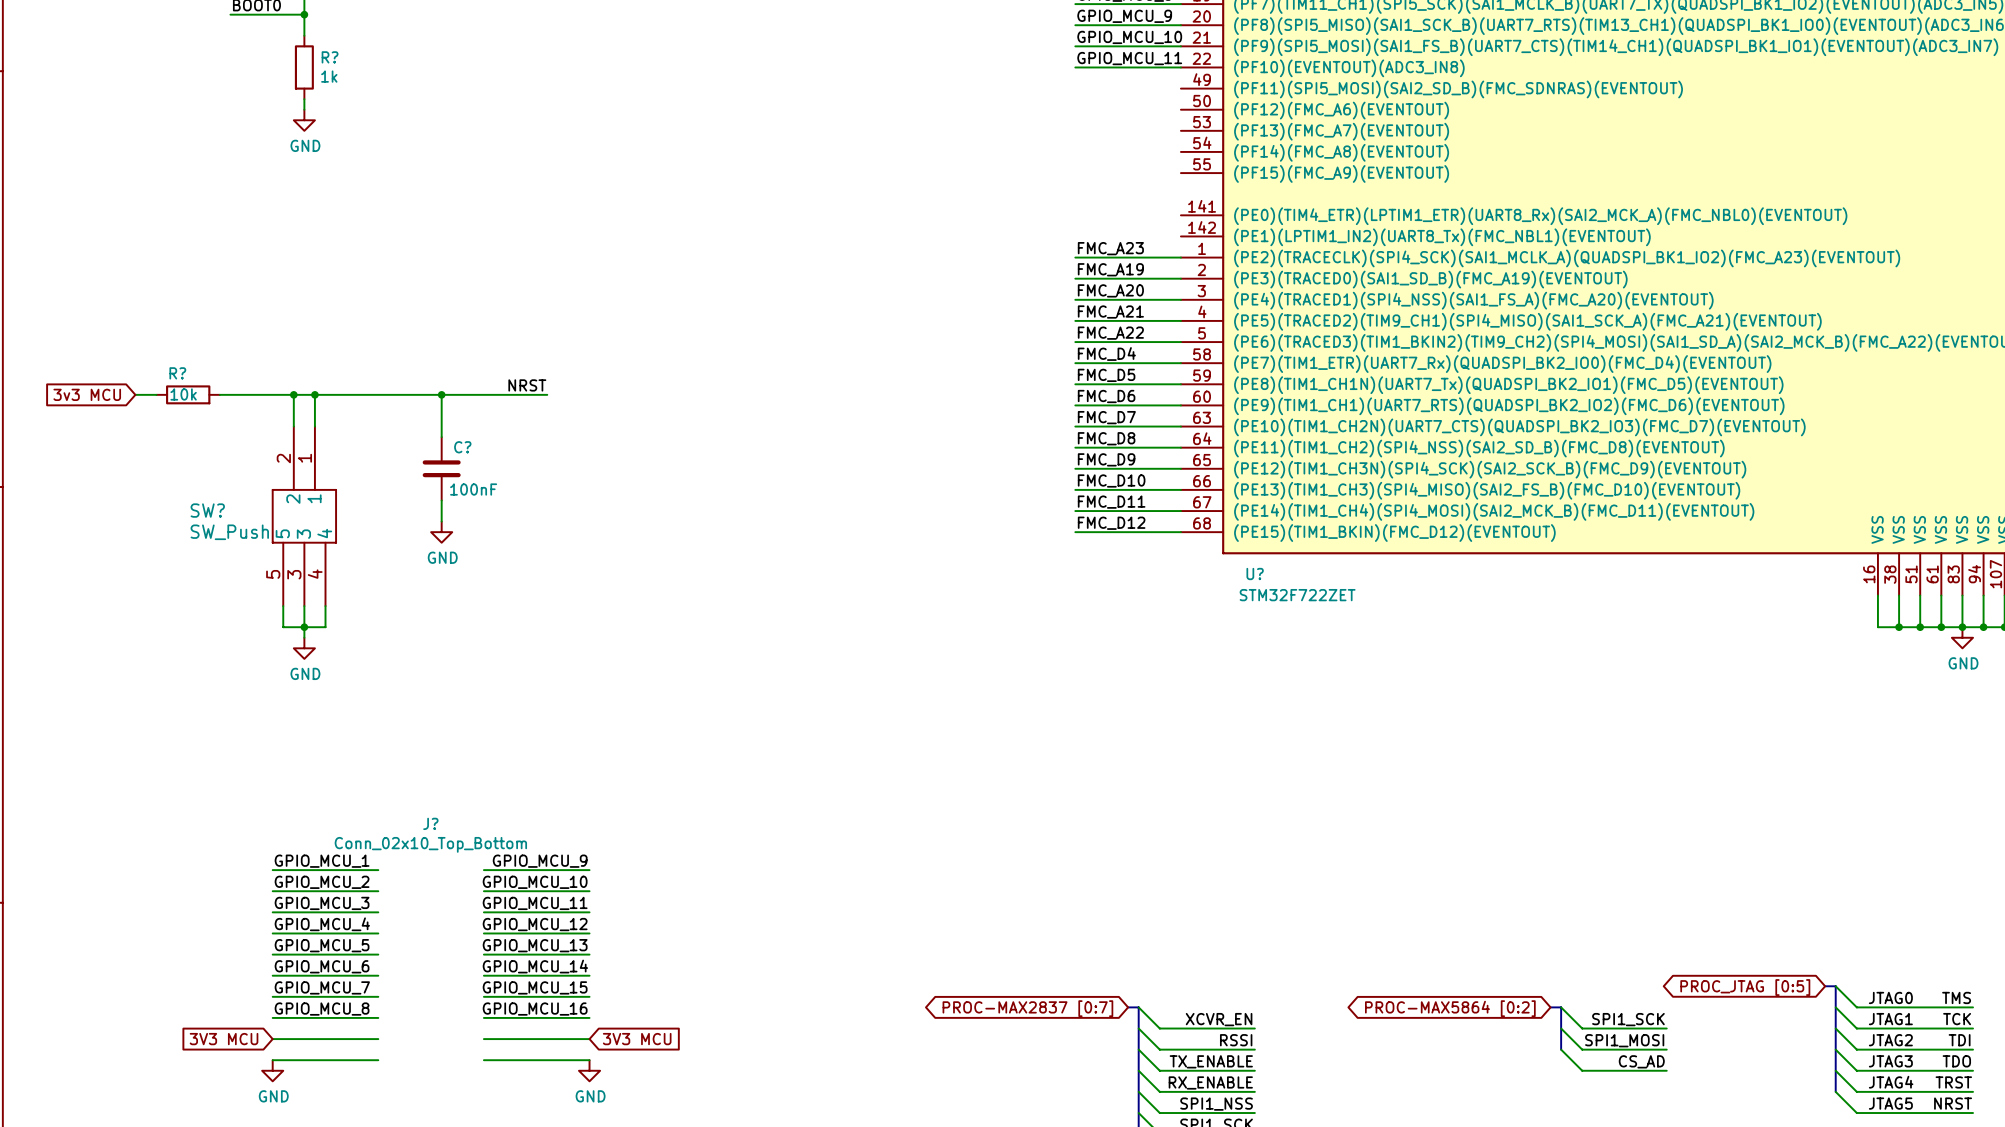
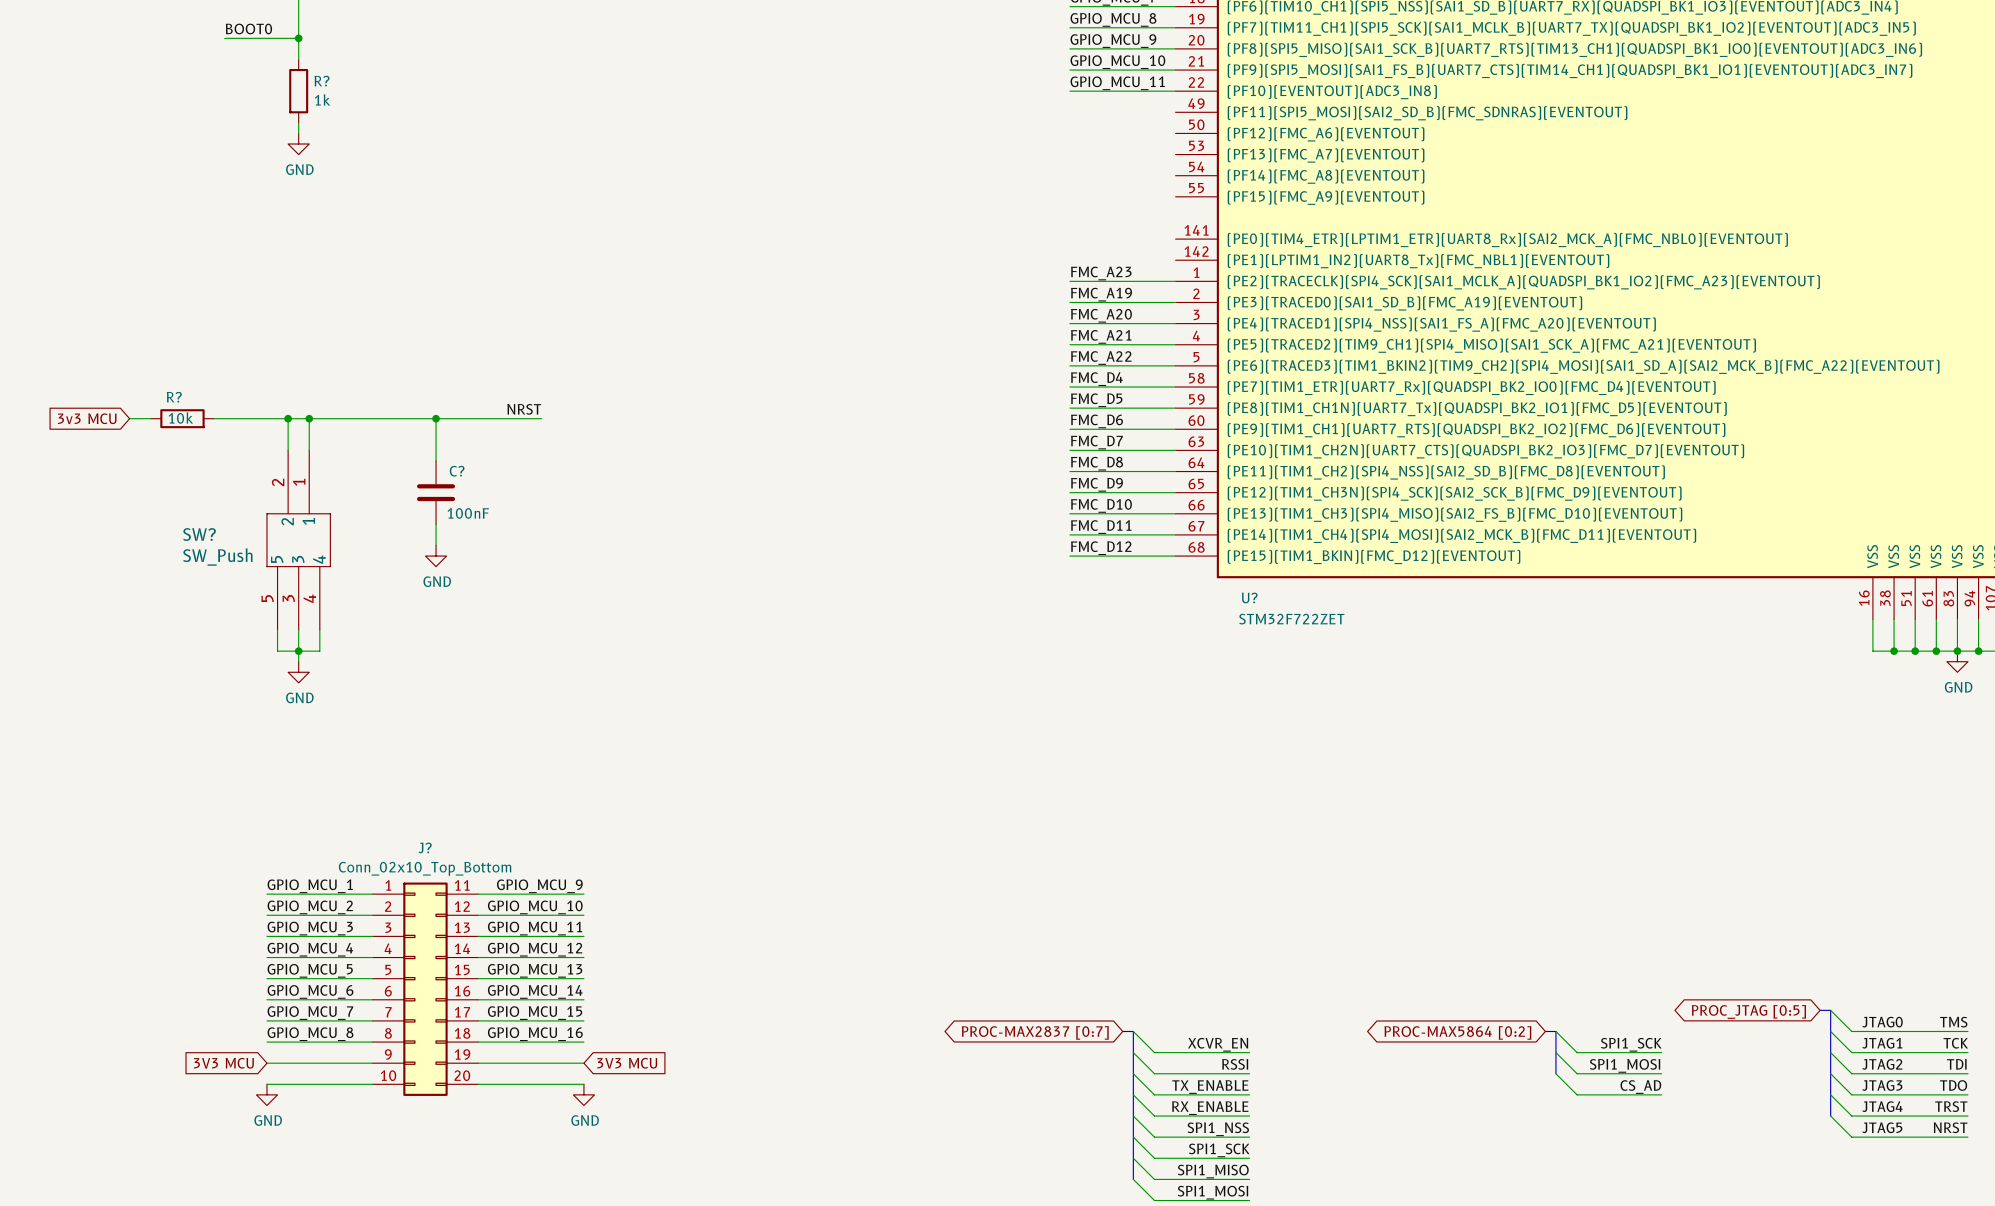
J?: none -> Conn_02x10_Top_Bottom (425, 989)

